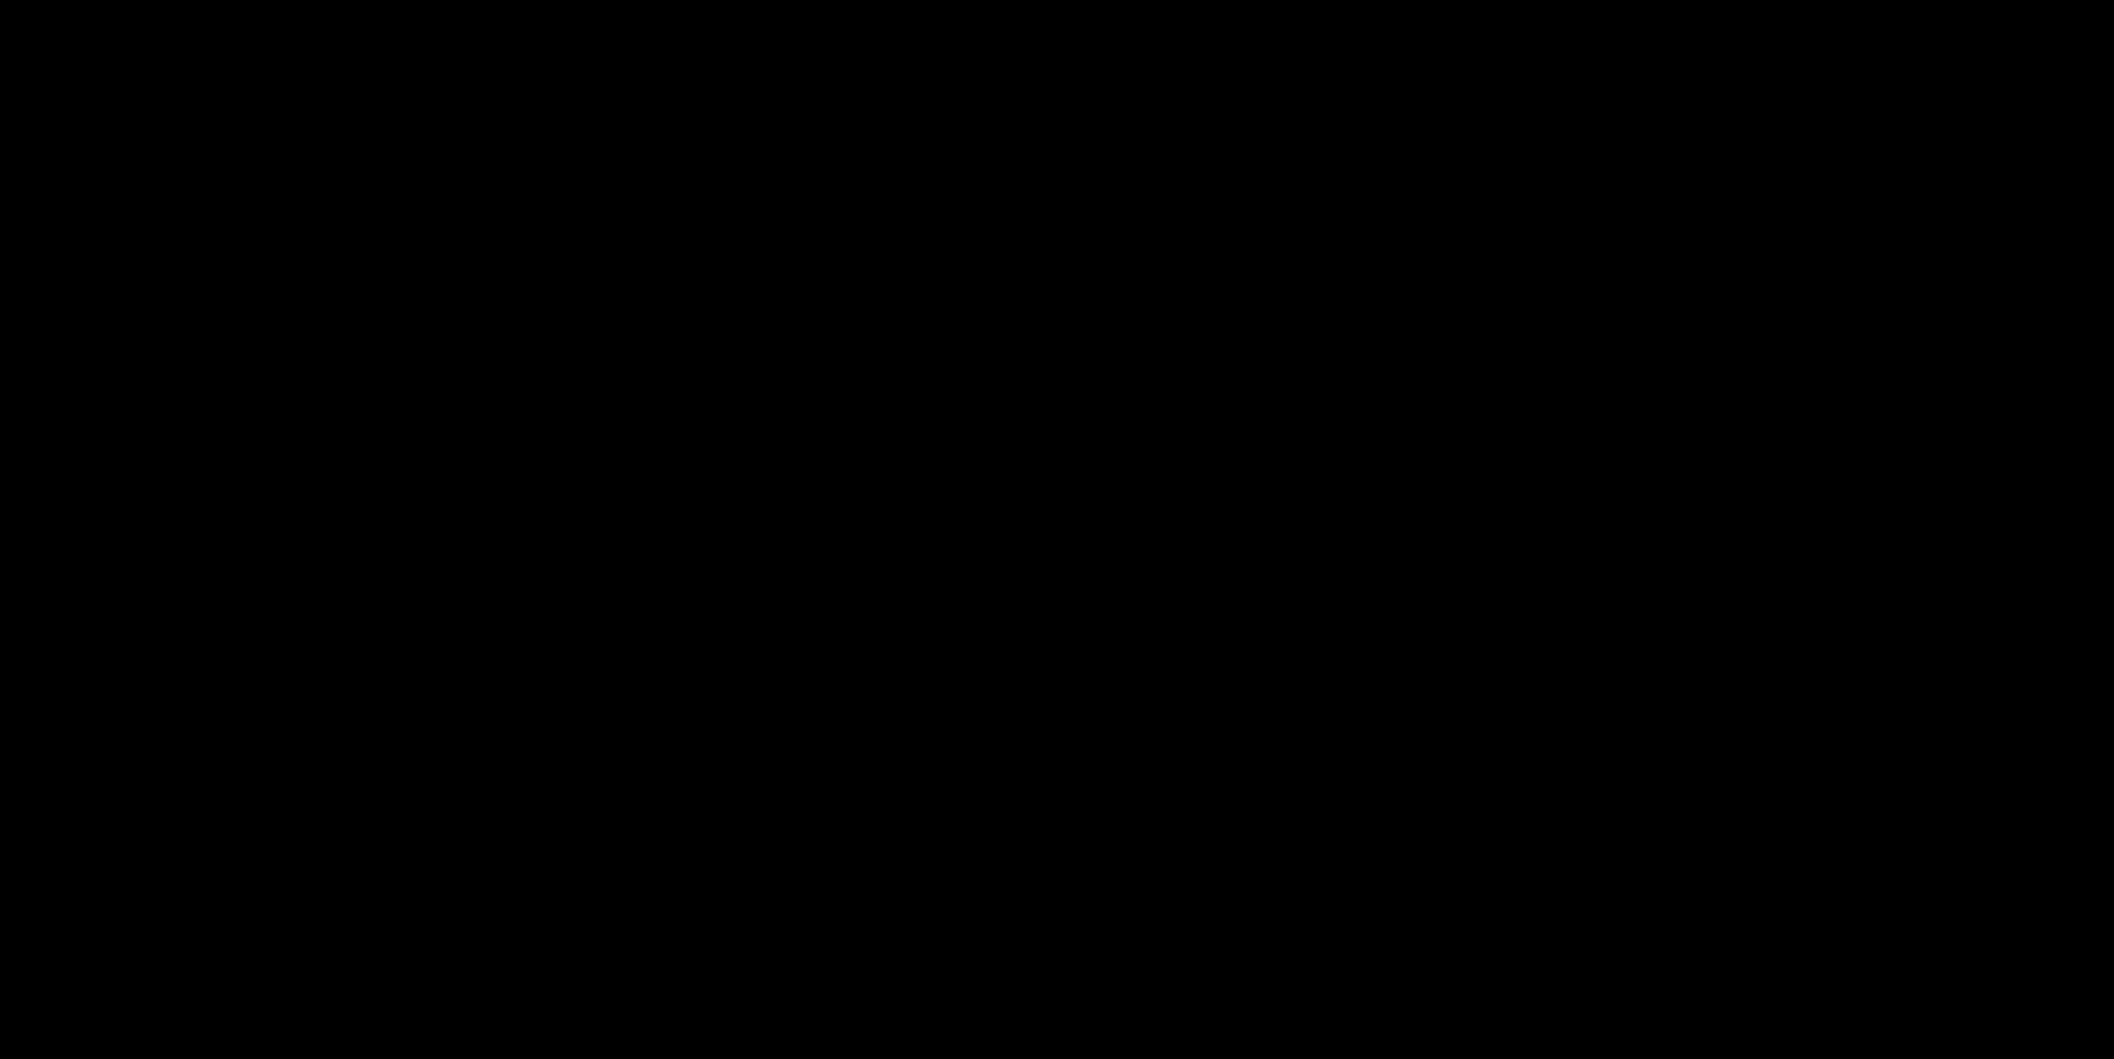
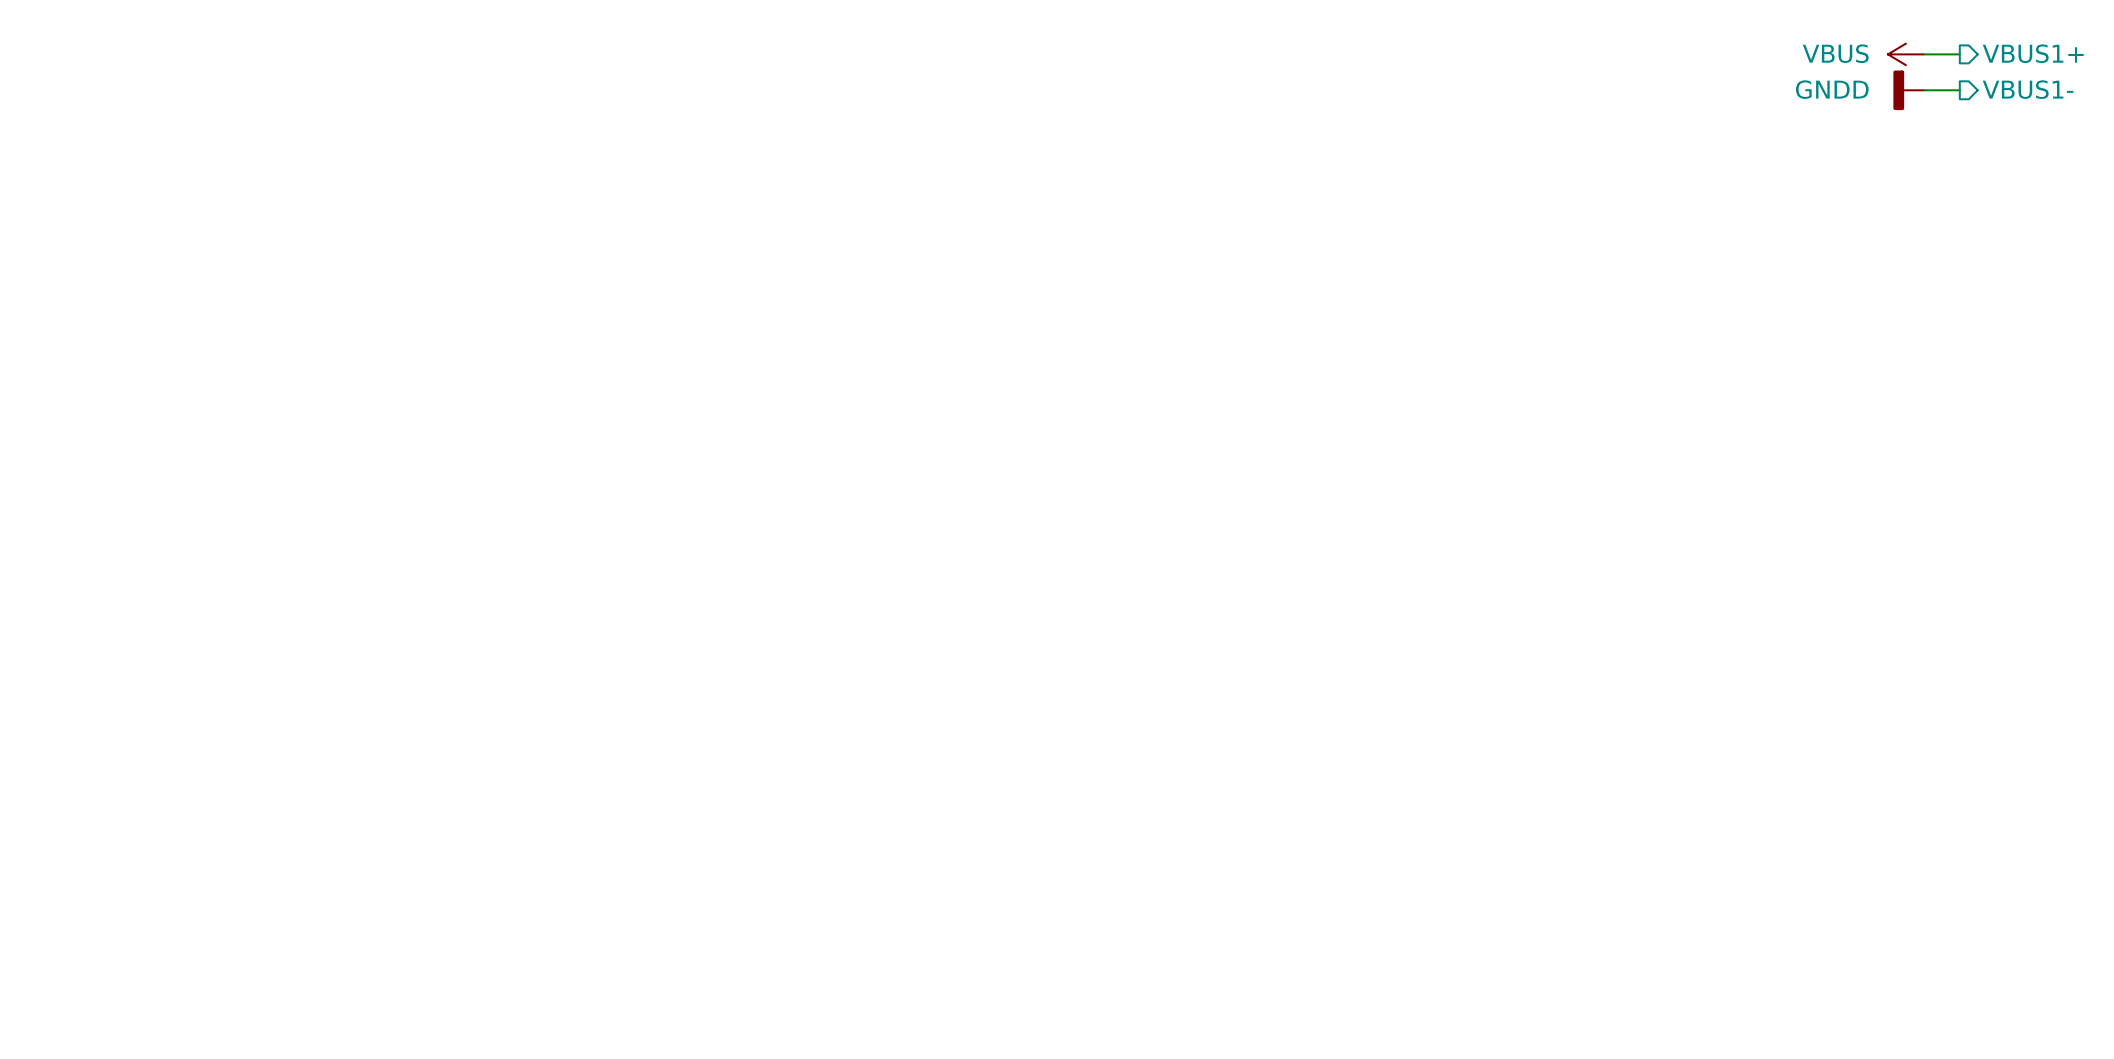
sheet pin: none -> VBUS1+ (2033, 53)
power symbol: none -> VBUS (1905, 54)
wire: none -> (1923, 54) (1959, 54)
sheet pin: none -> VBUS1- (2028, 89)
power symbol: none -> GNDD (1908, 90)
wire: none -> (1923, 90) (1959, 90)

